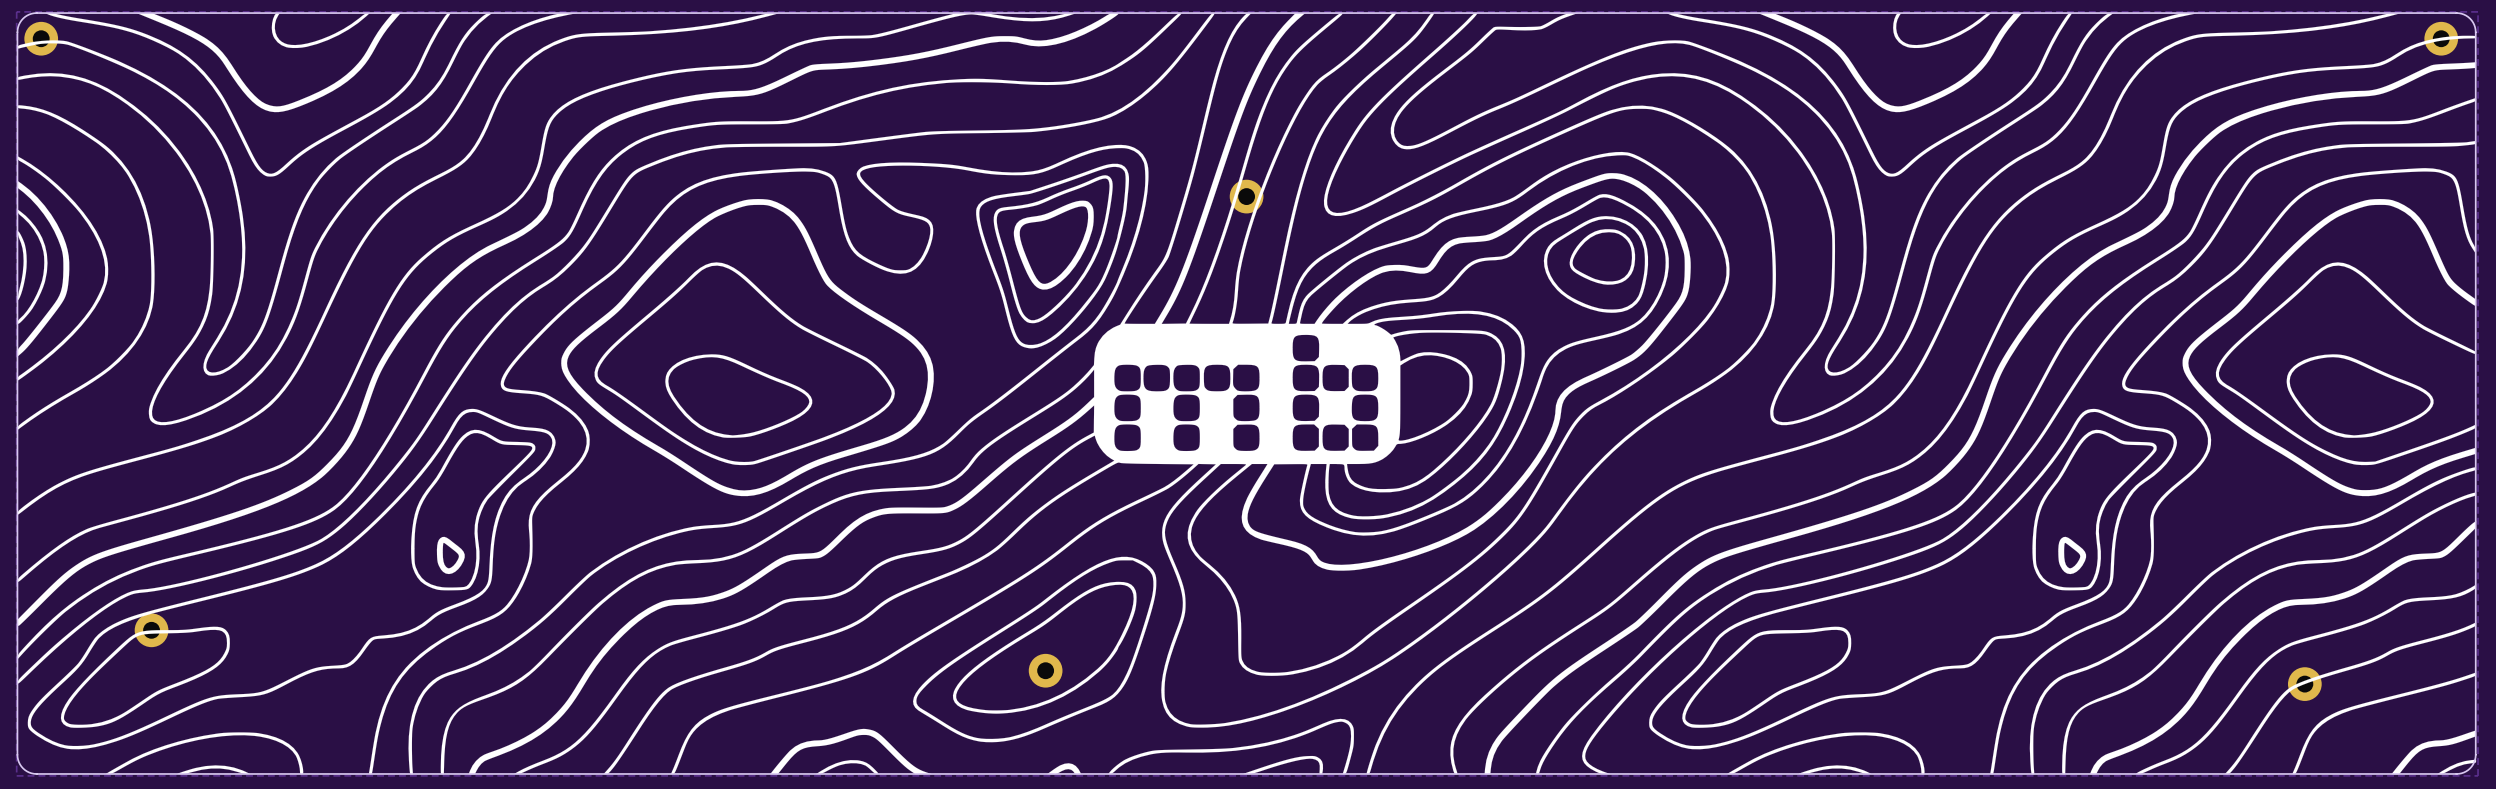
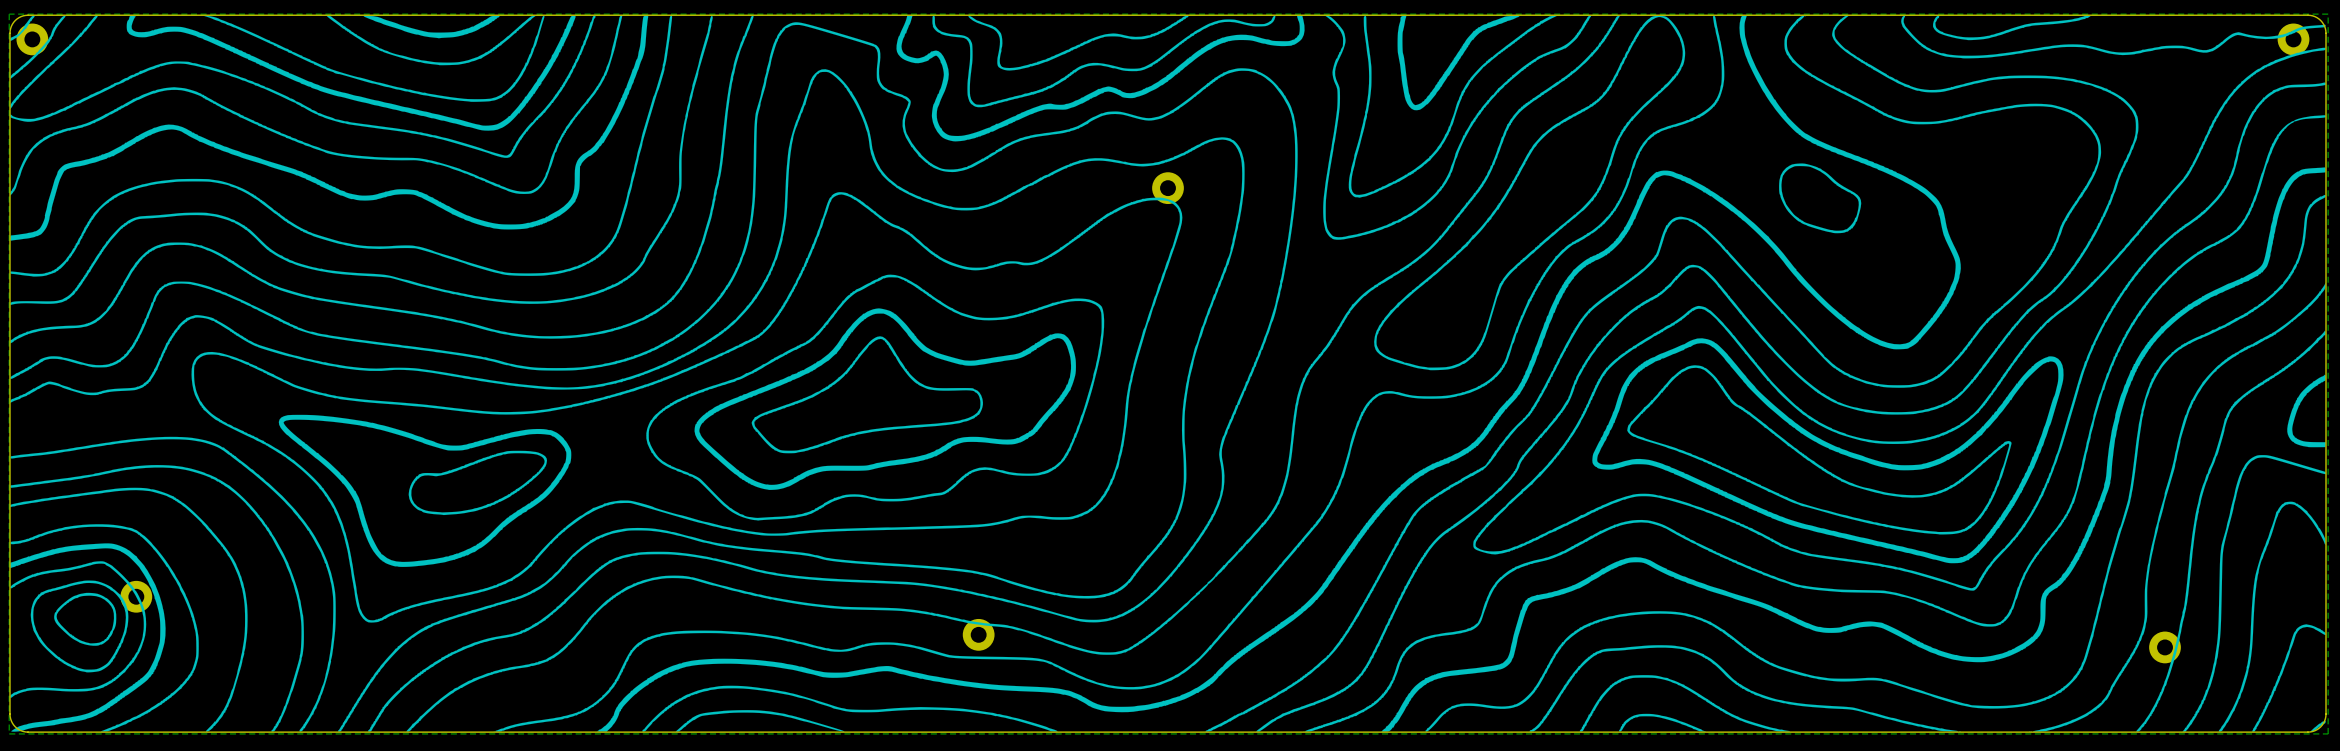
drawing shape: [17, 13, 2477, 775] -> [10, 15, 2326, 732]

